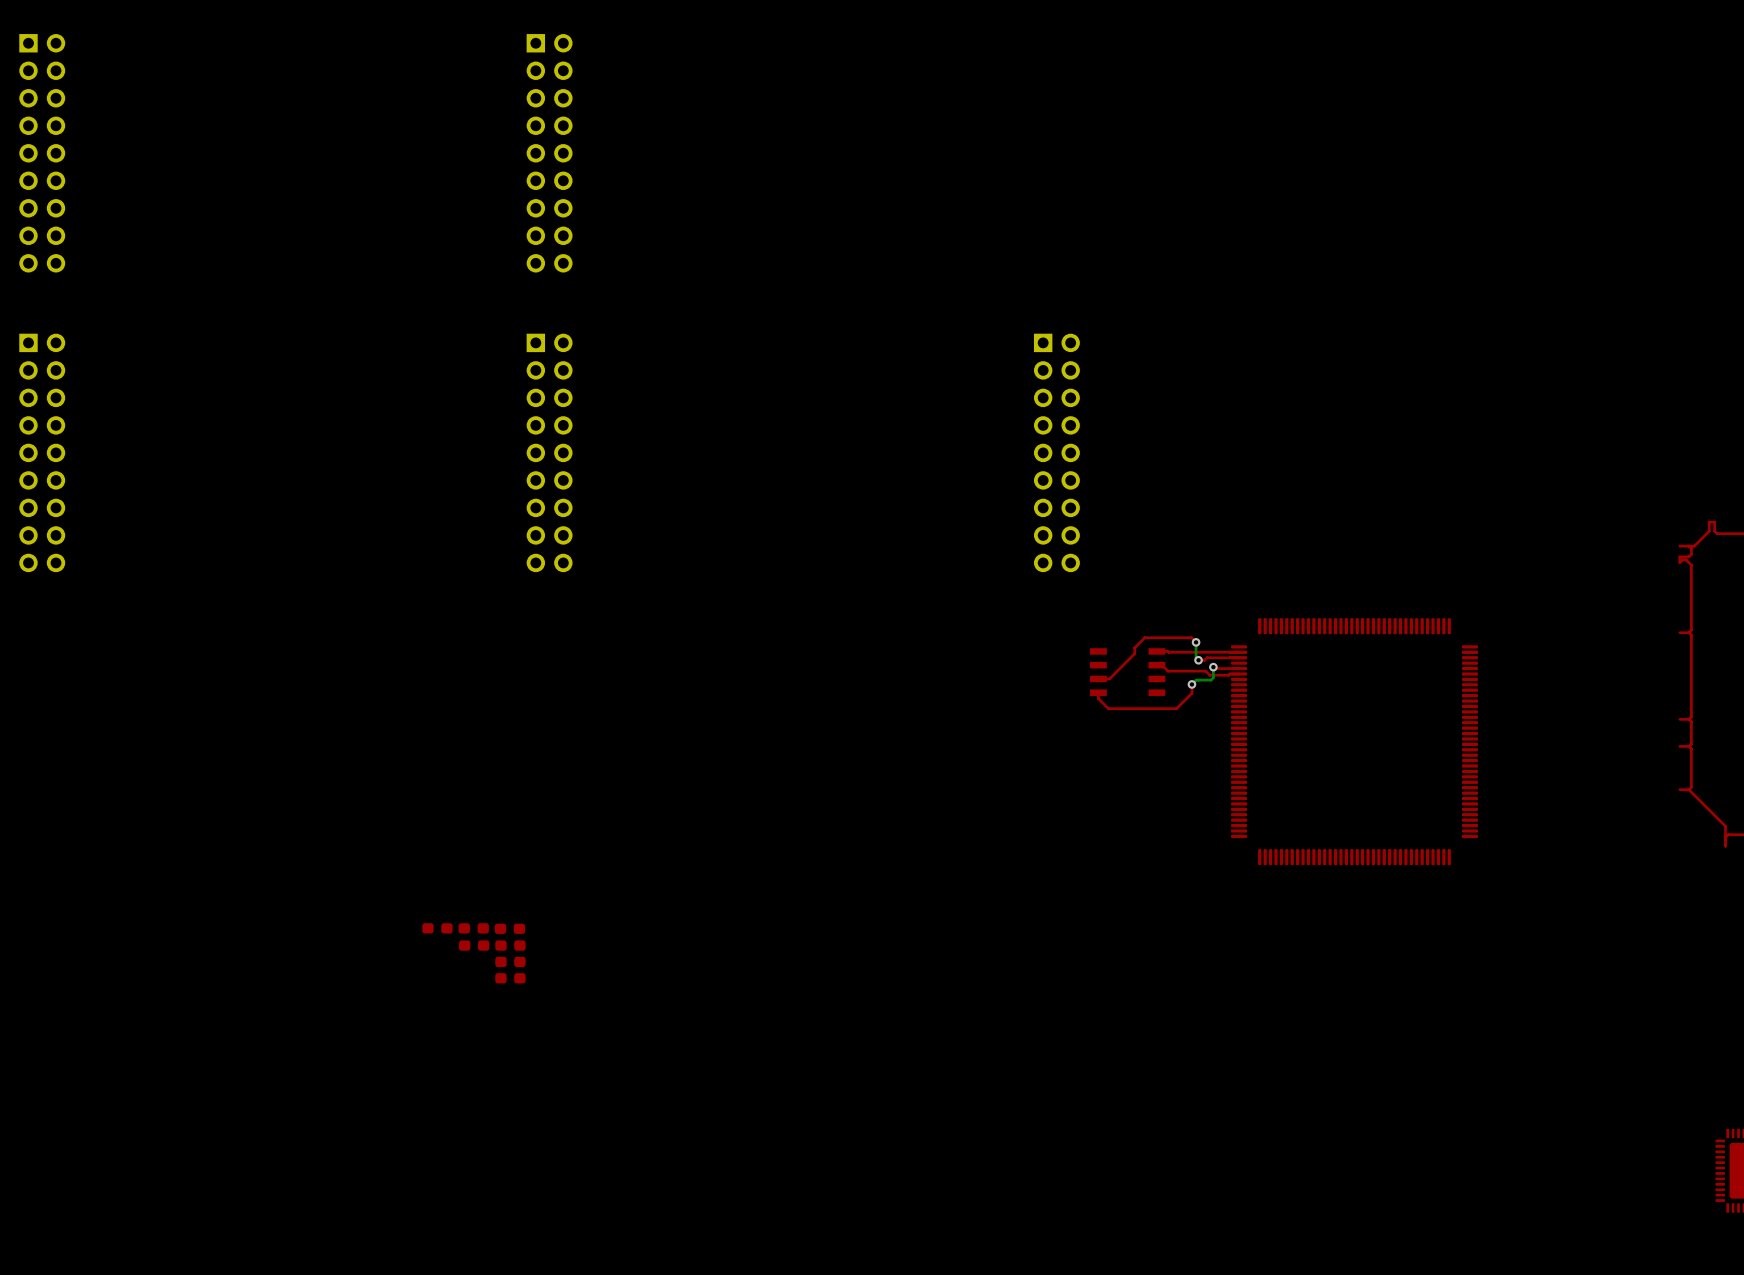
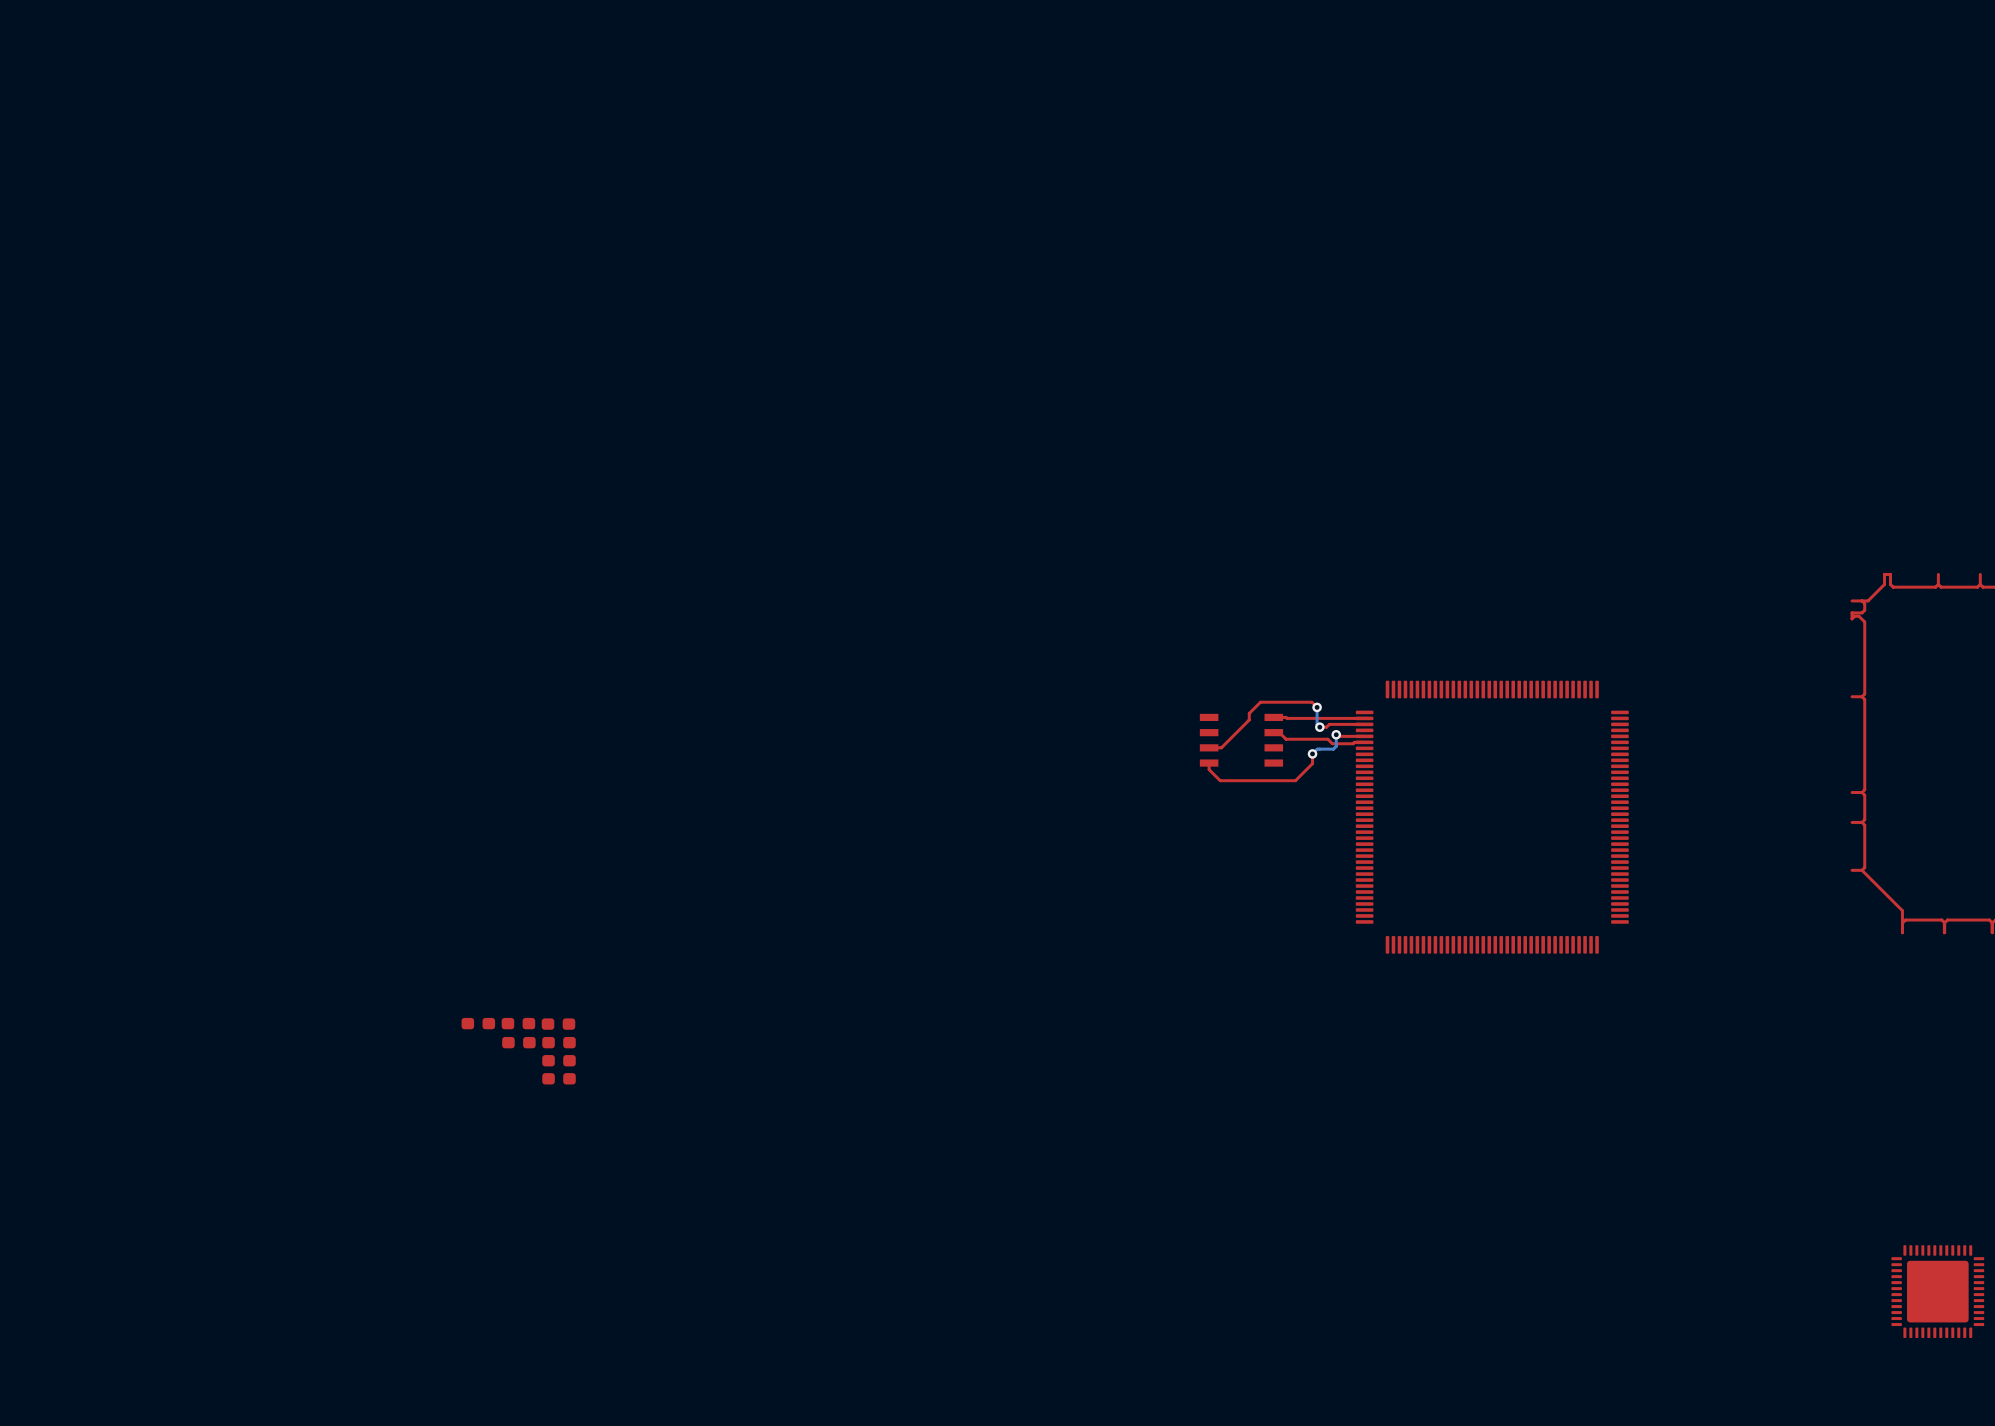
part: (42, 153) -> none
part: (549, 153) -> none
part: (42, 452) -> none
part: (549, 452) -> none
part: (1056, 452) -> none

